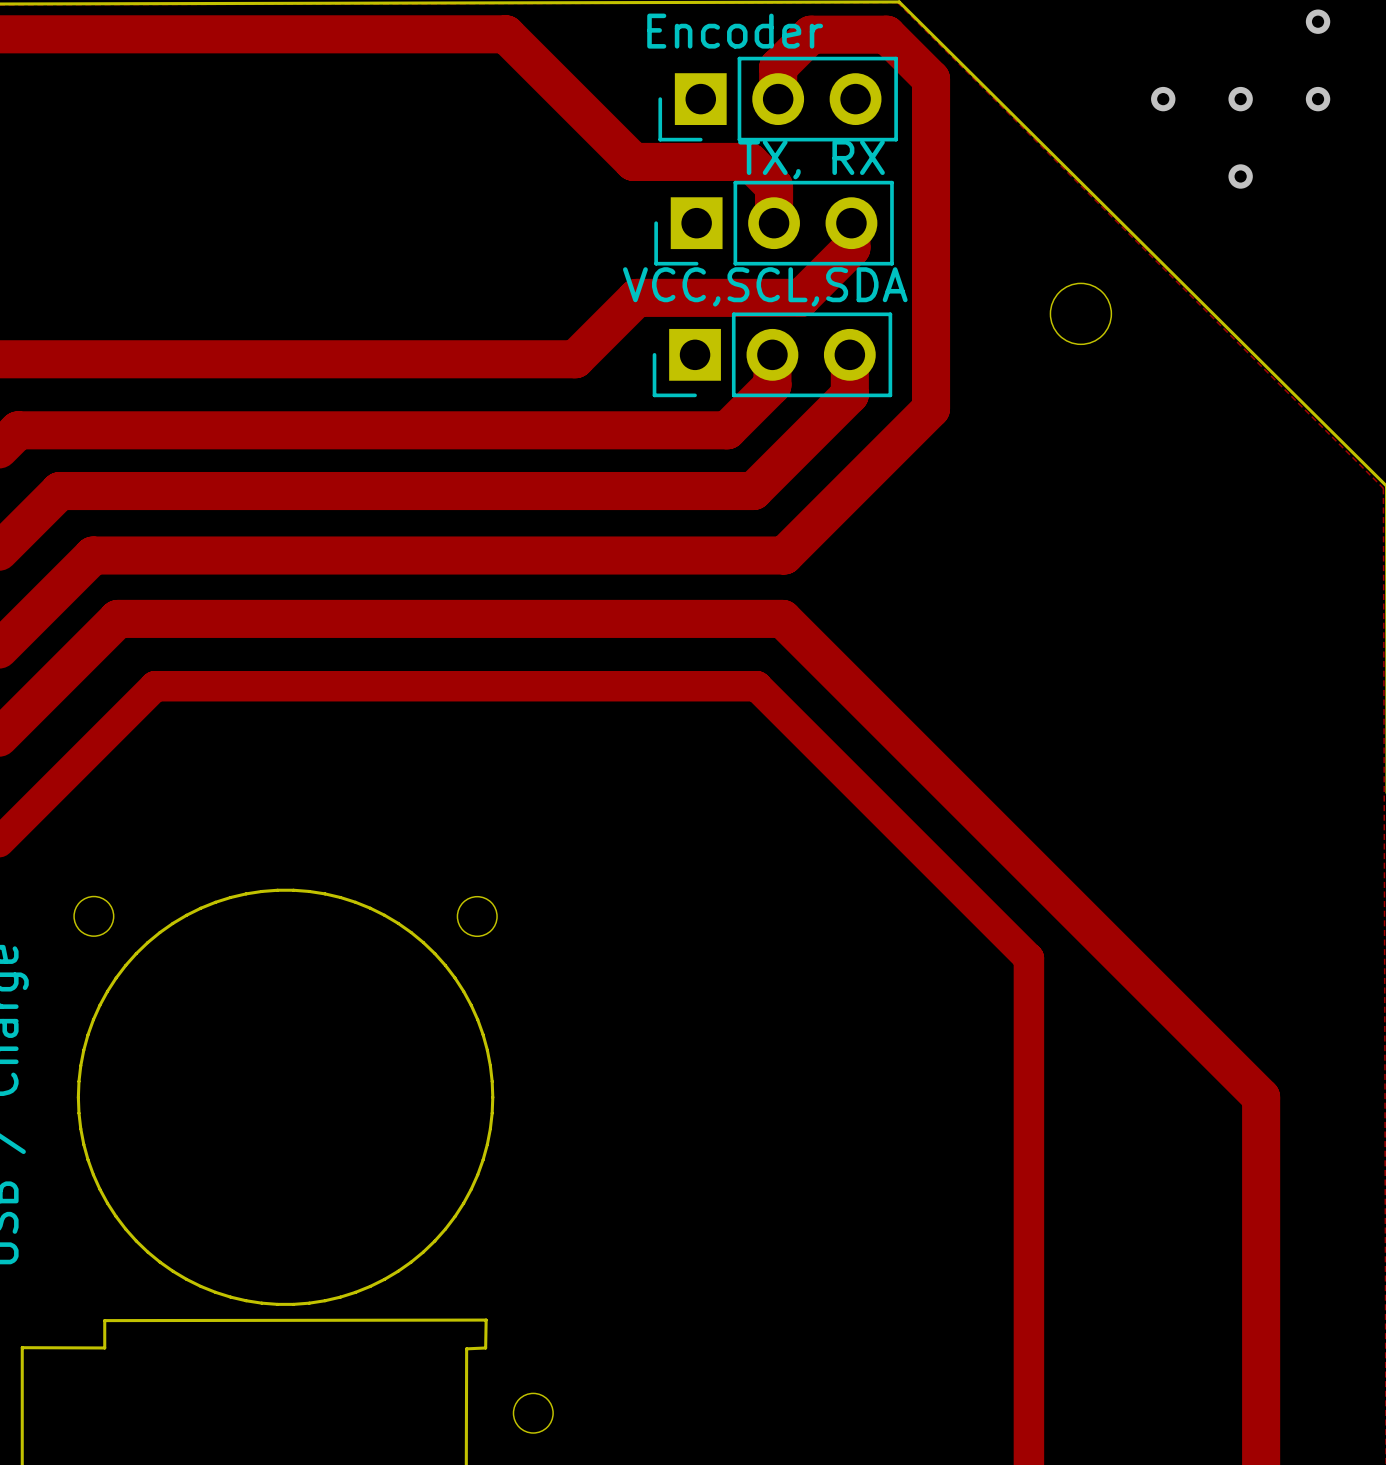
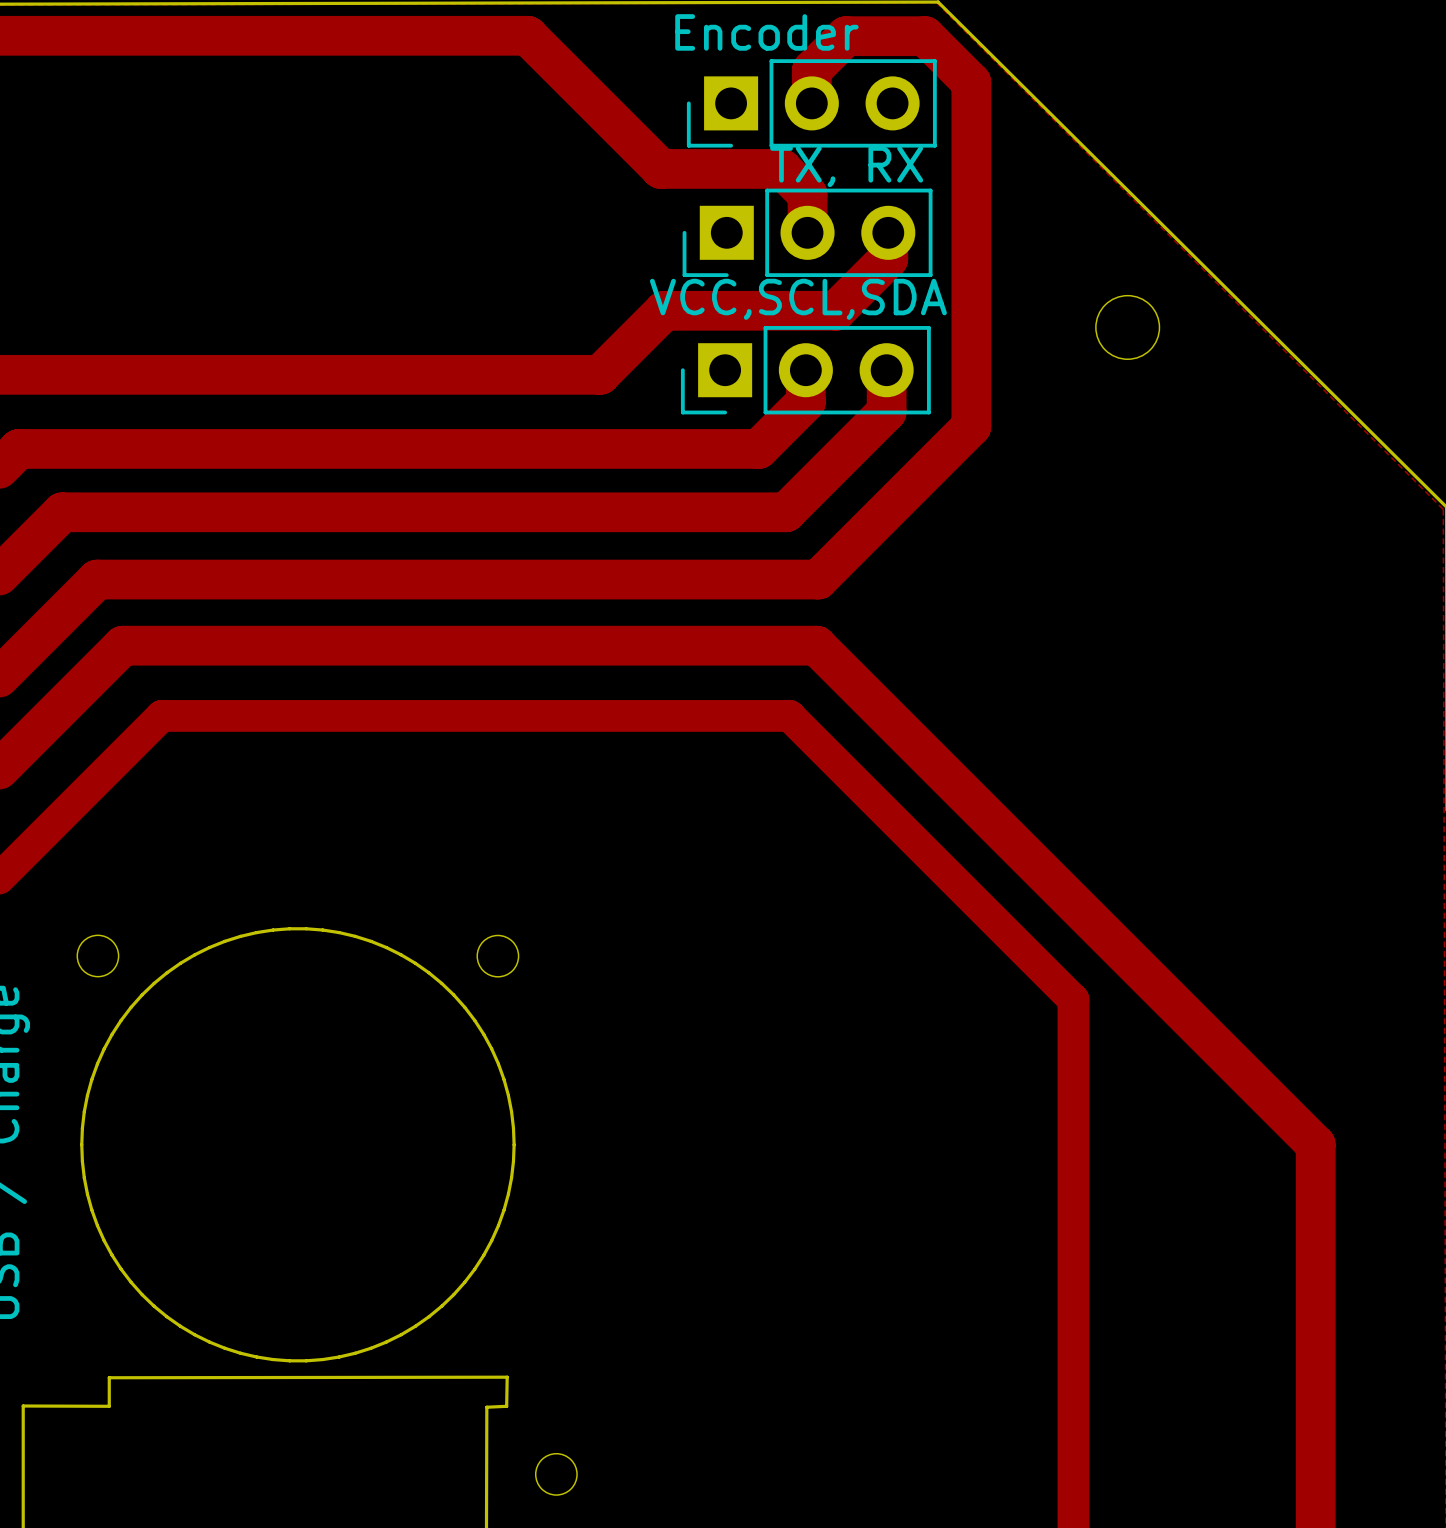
via: (1318, 21) -> none
via: (1163, 99) -> none
via: (1240, 99) -> none
via: (1318, 99) -> none
via: (1240, 176) -> none

